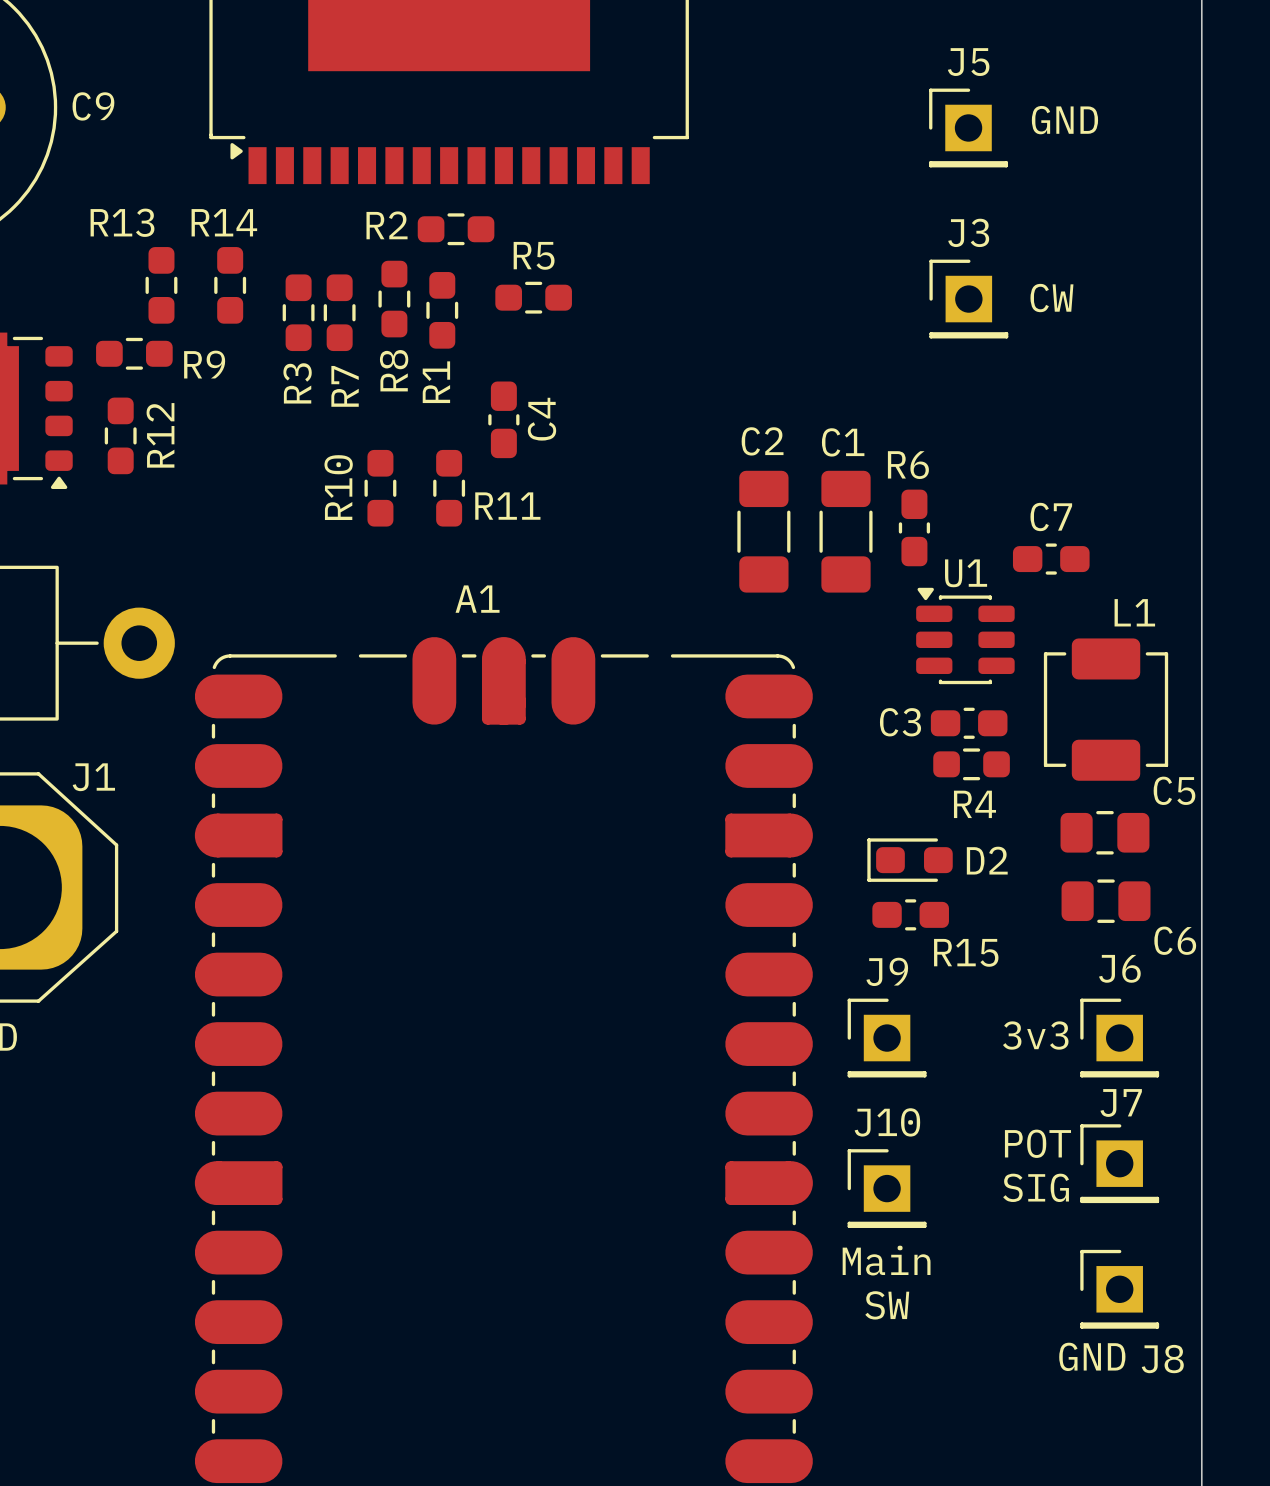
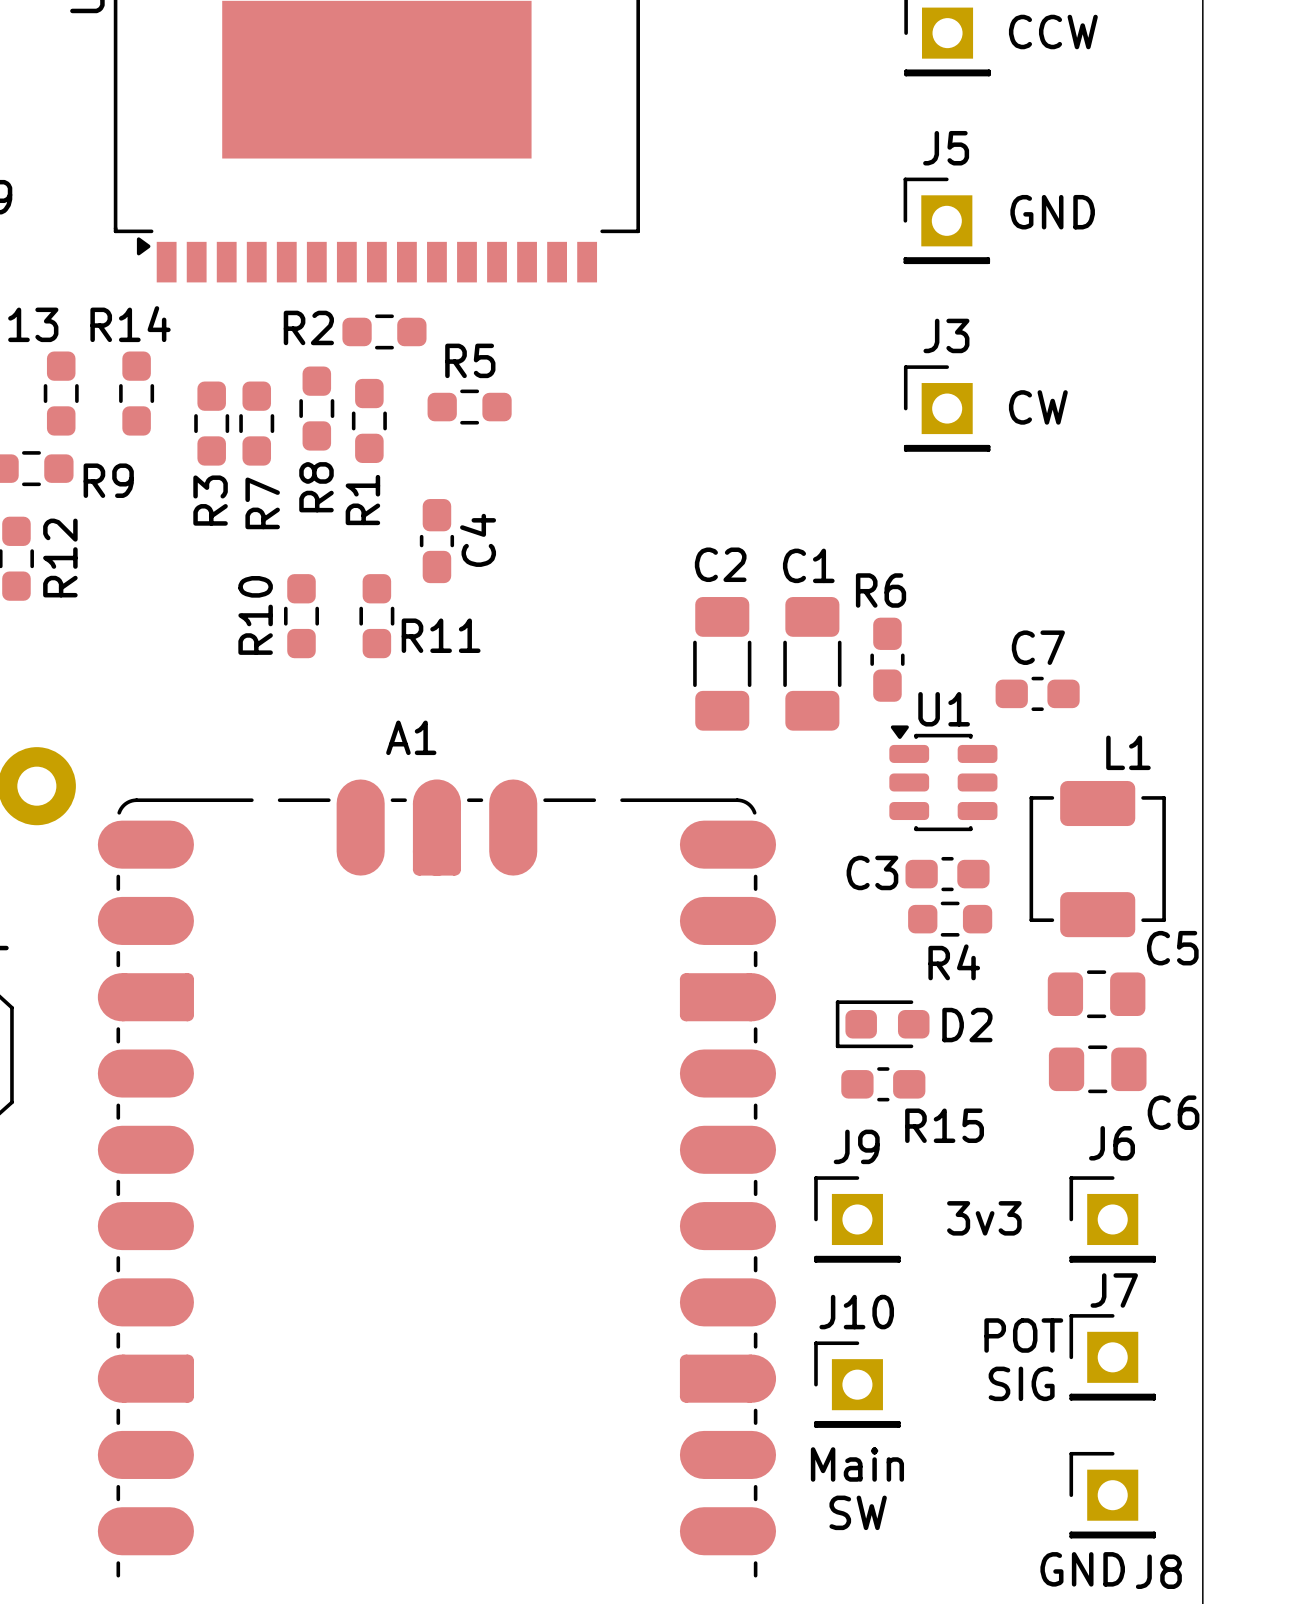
text position: 3v3 (1035, 1035) -> 3v3 (984, 1218)

